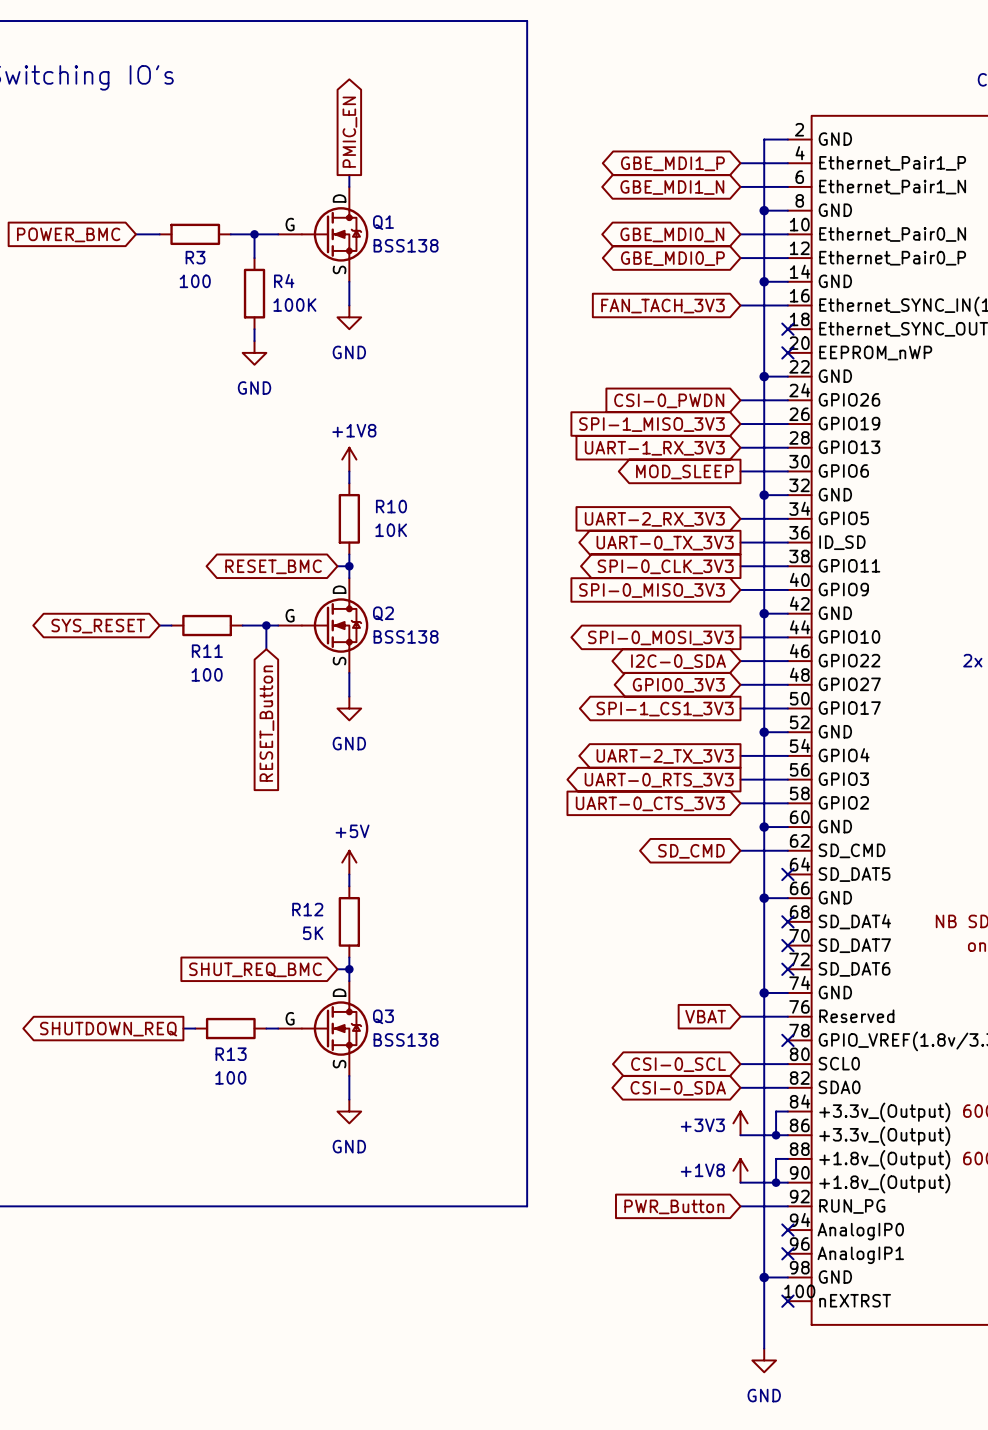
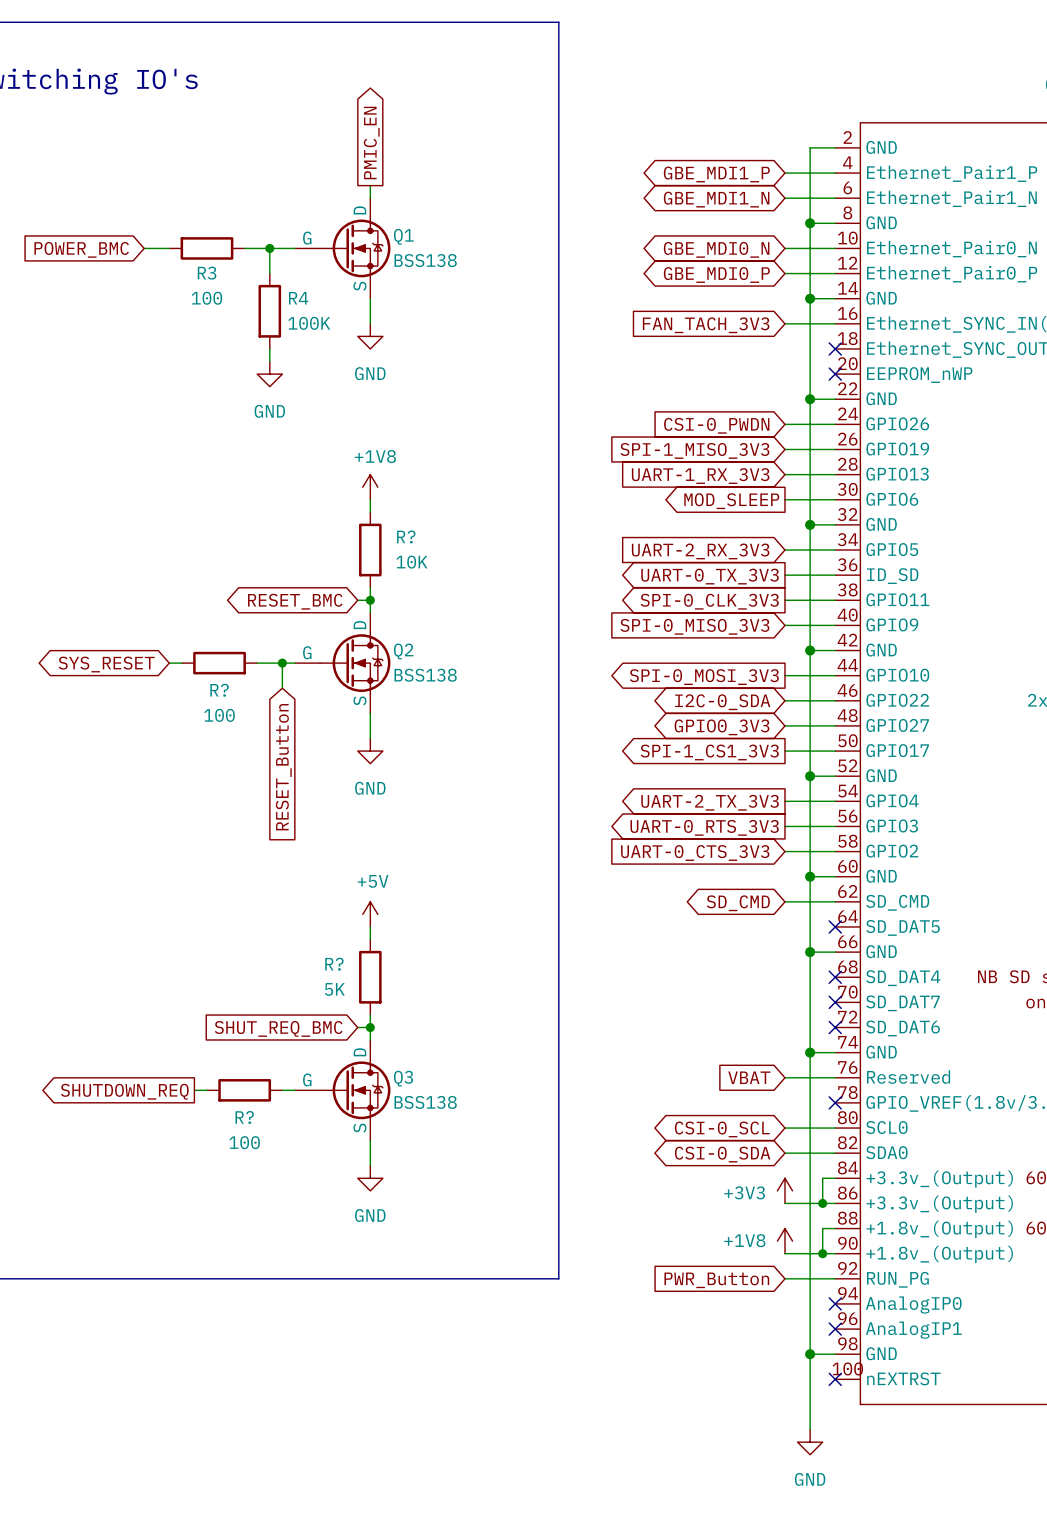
R10 name: R10 (391, 506) -> R? (406, 536)
R11 name: R11 (207, 651) -> R? (219, 690)
R12 name: R12 (307, 909) -> R? (334, 964)
R13 name: R13 (231, 1054) -> R? (244, 1117)

